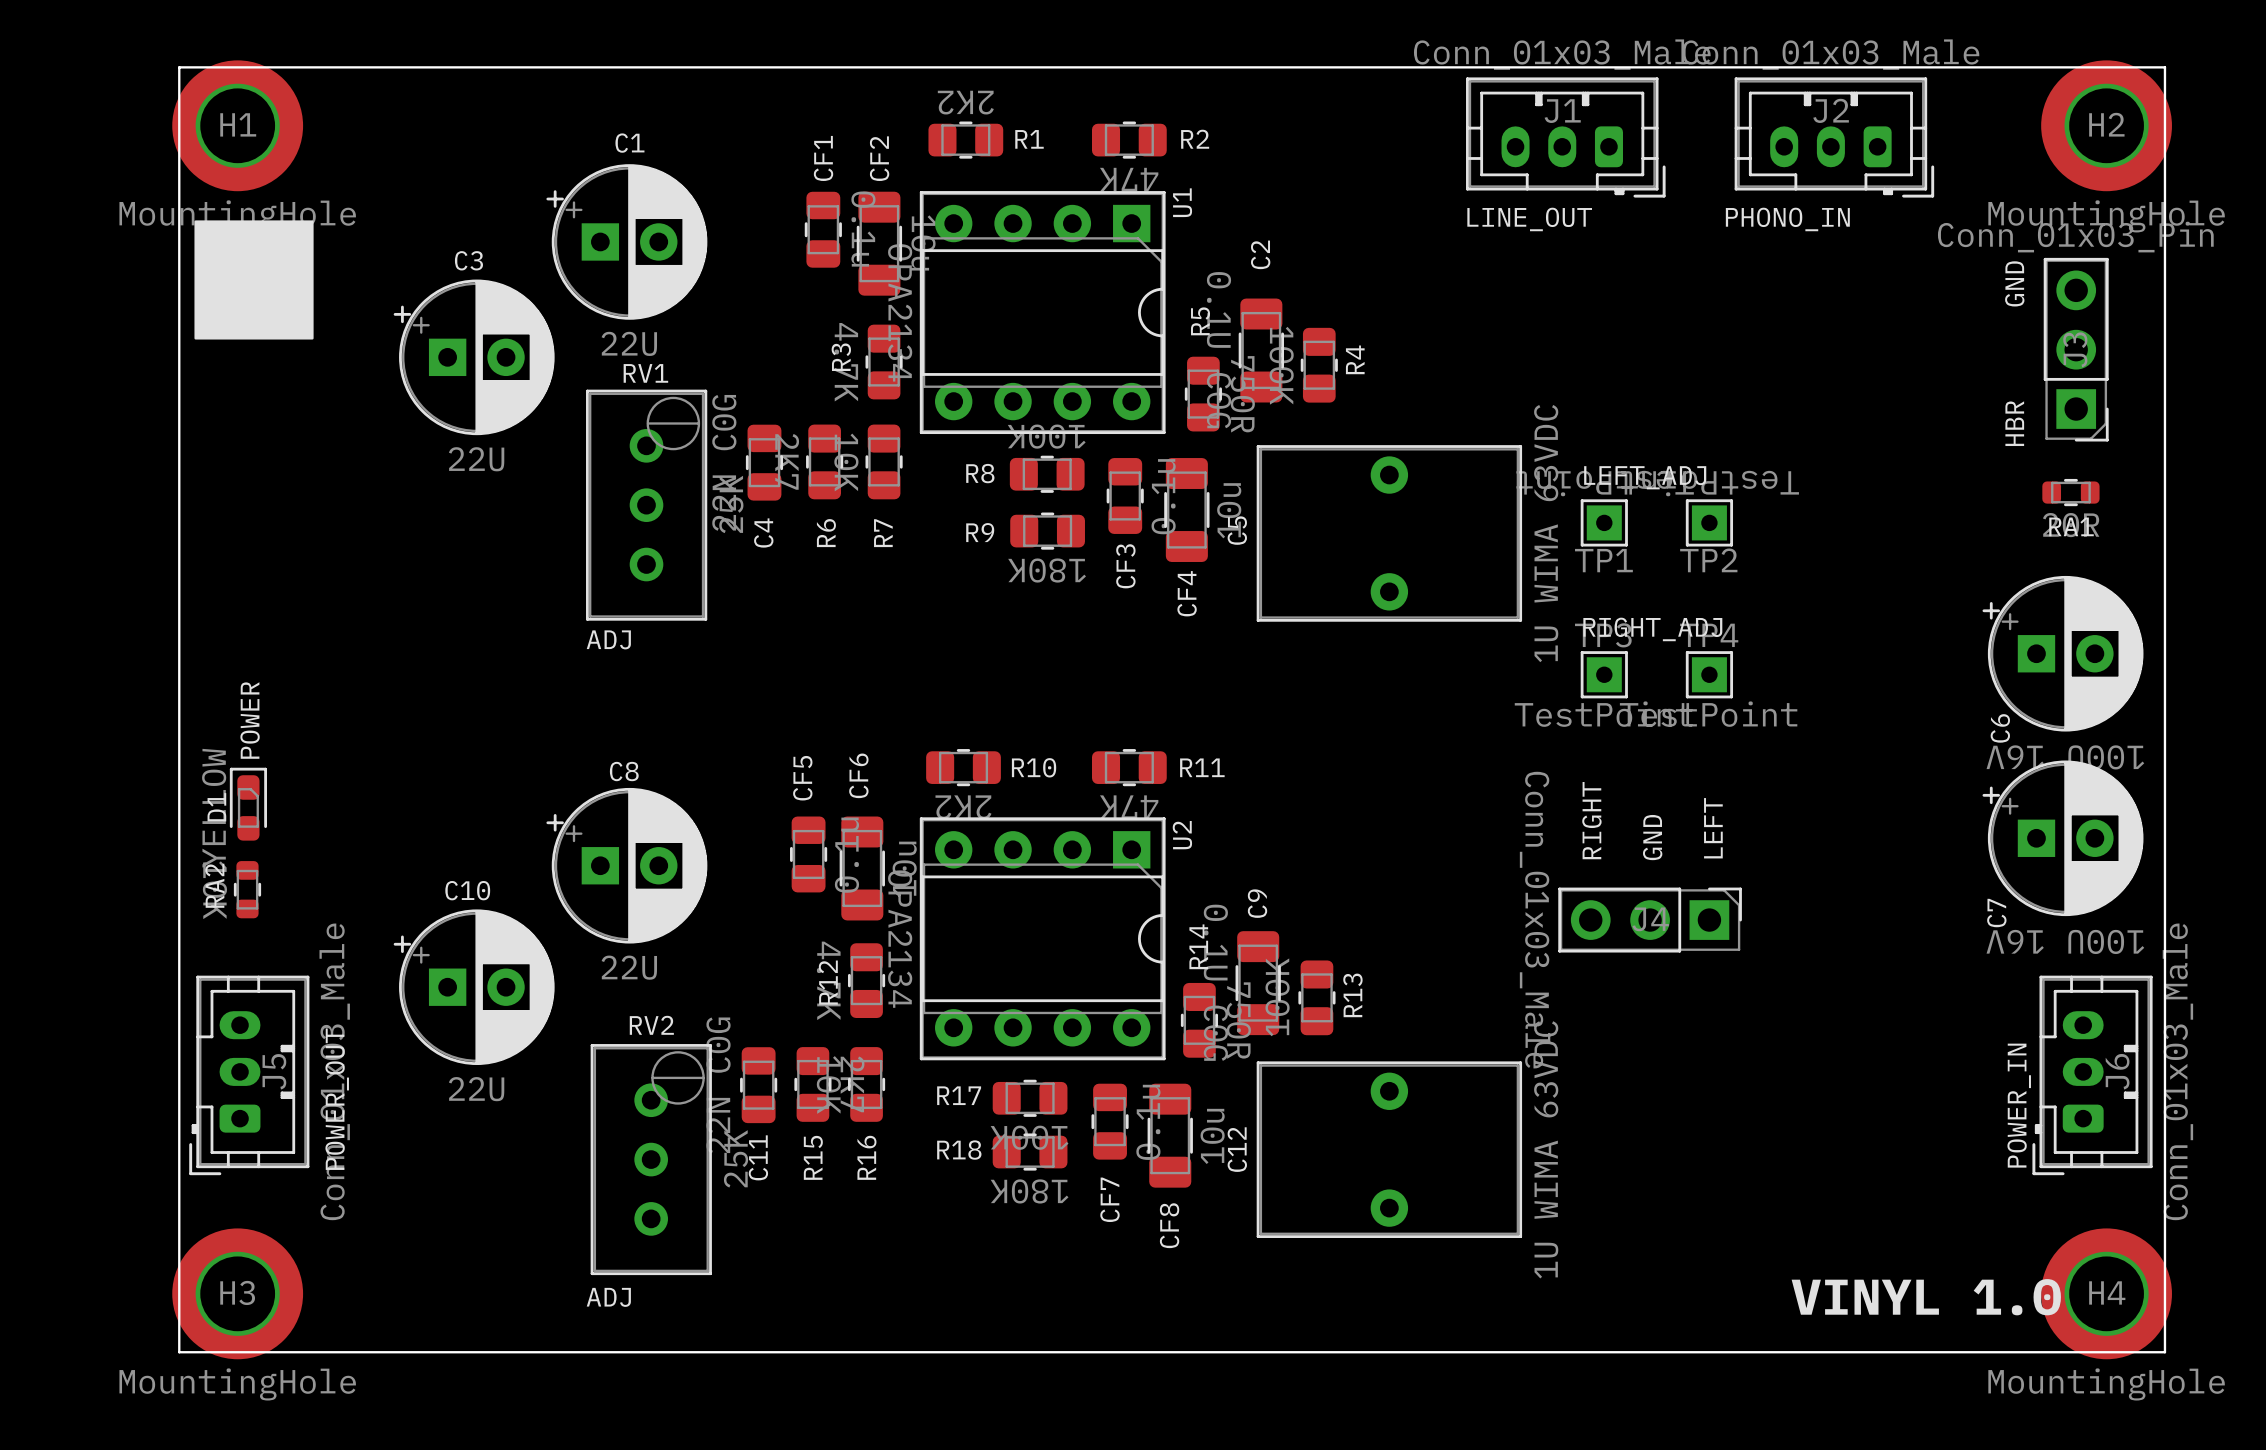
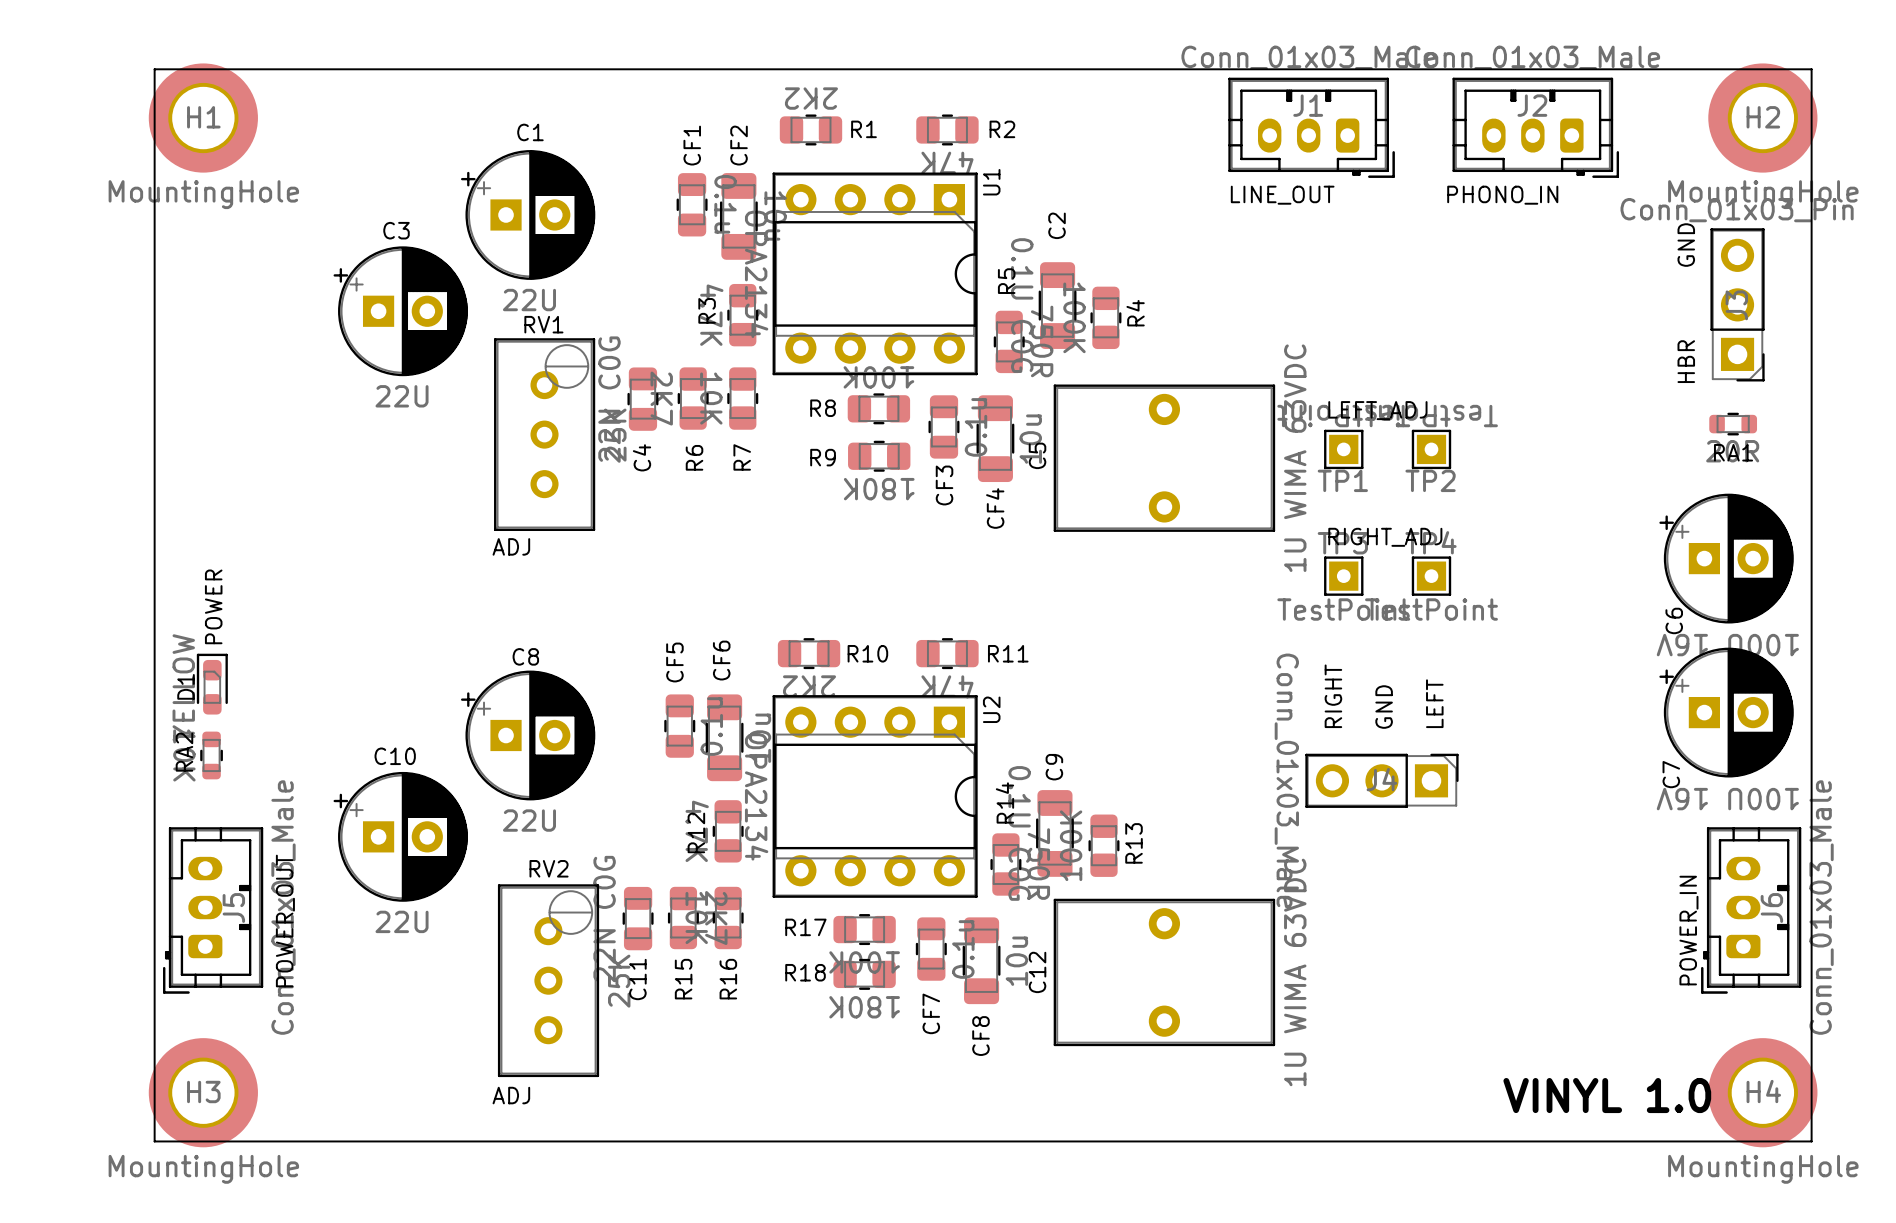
drawing: [194, 220, 314, 340] -> none

